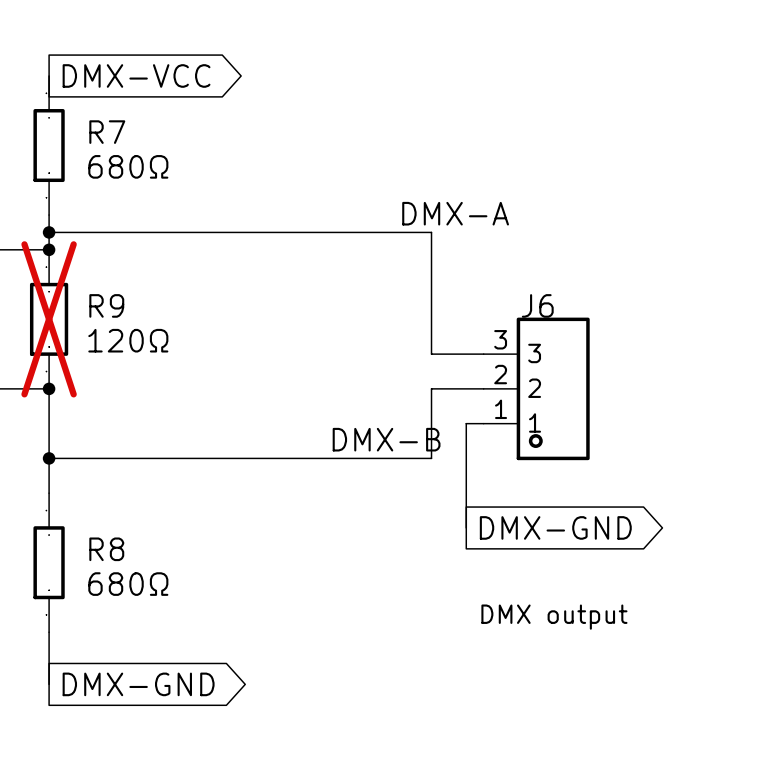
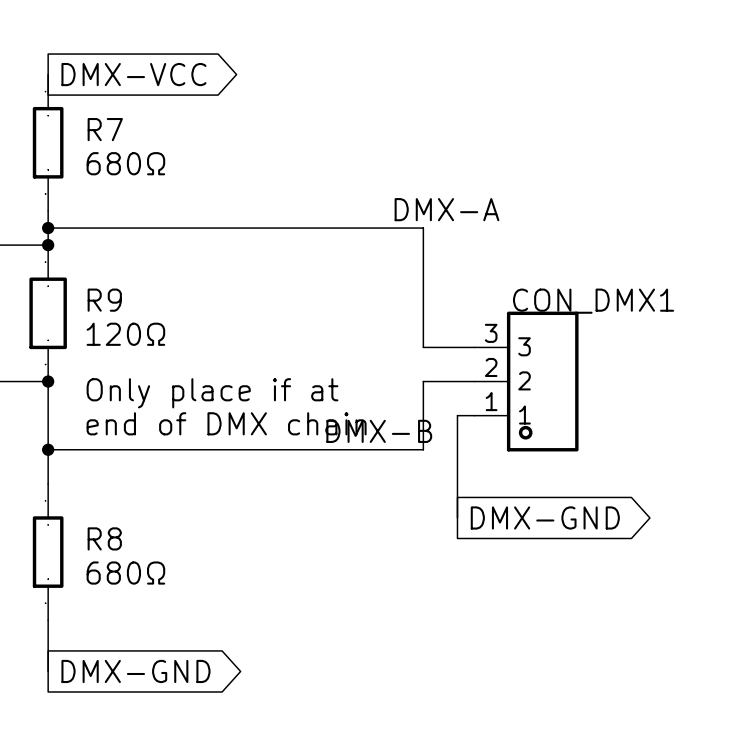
J6 name: J6 (537, 305) -> CON_DMX1 (593, 301)
R9 do-not-place cross: (49, 319) -> none
text: none -> Only place if at (212, 393)
text: none -> end of DMX chain (226, 423)
J6 value: DMX output (554, 617) -> none

